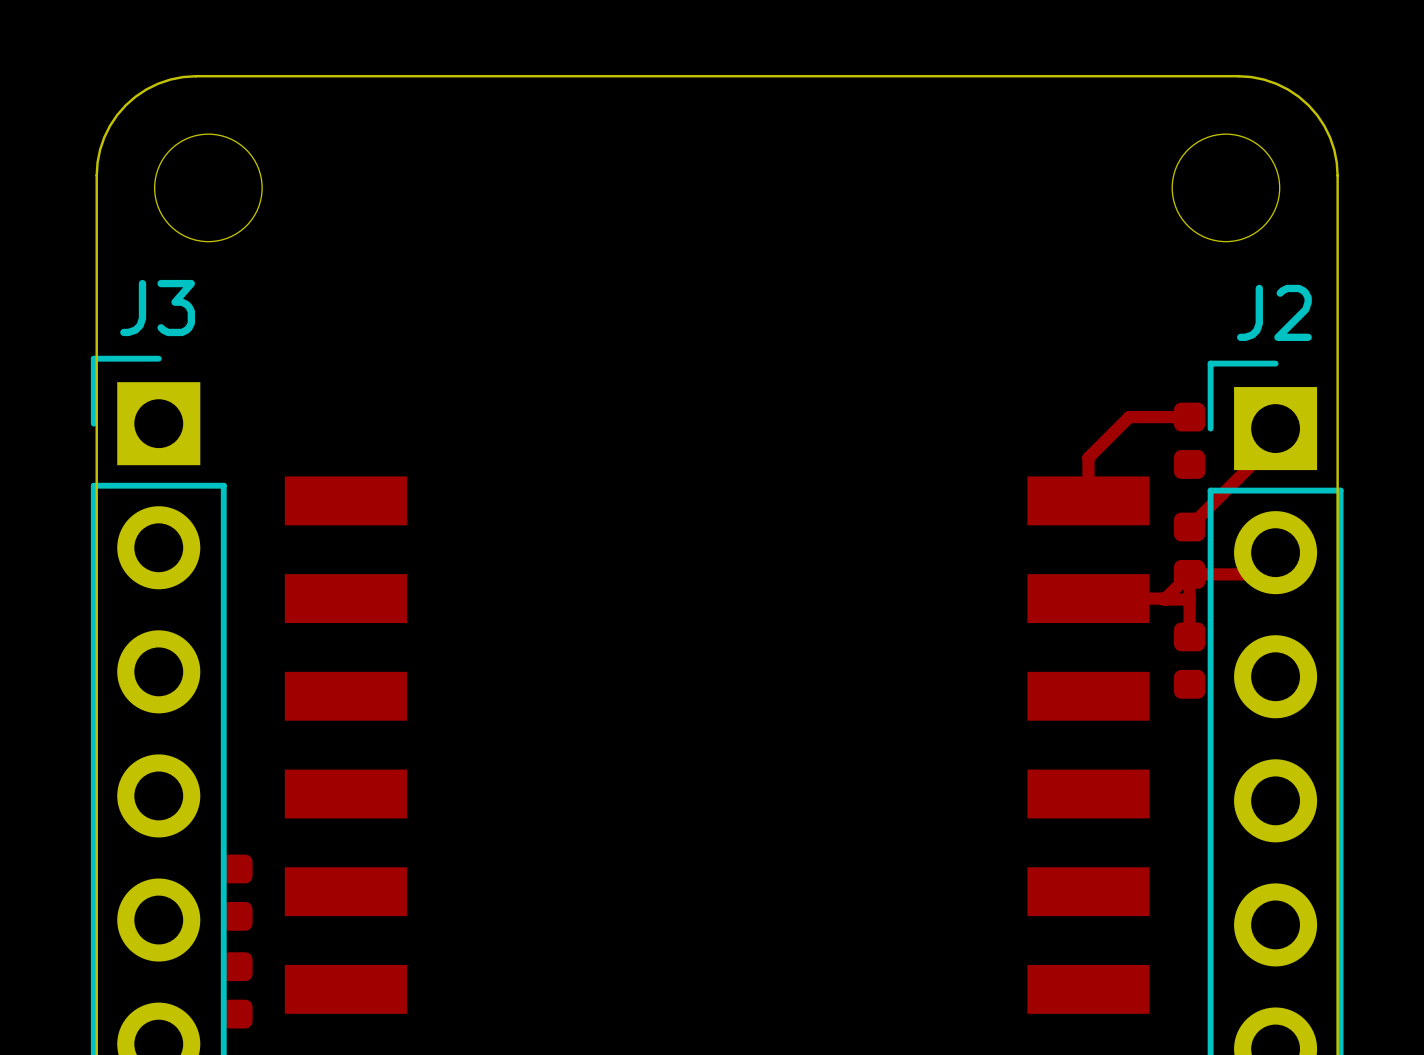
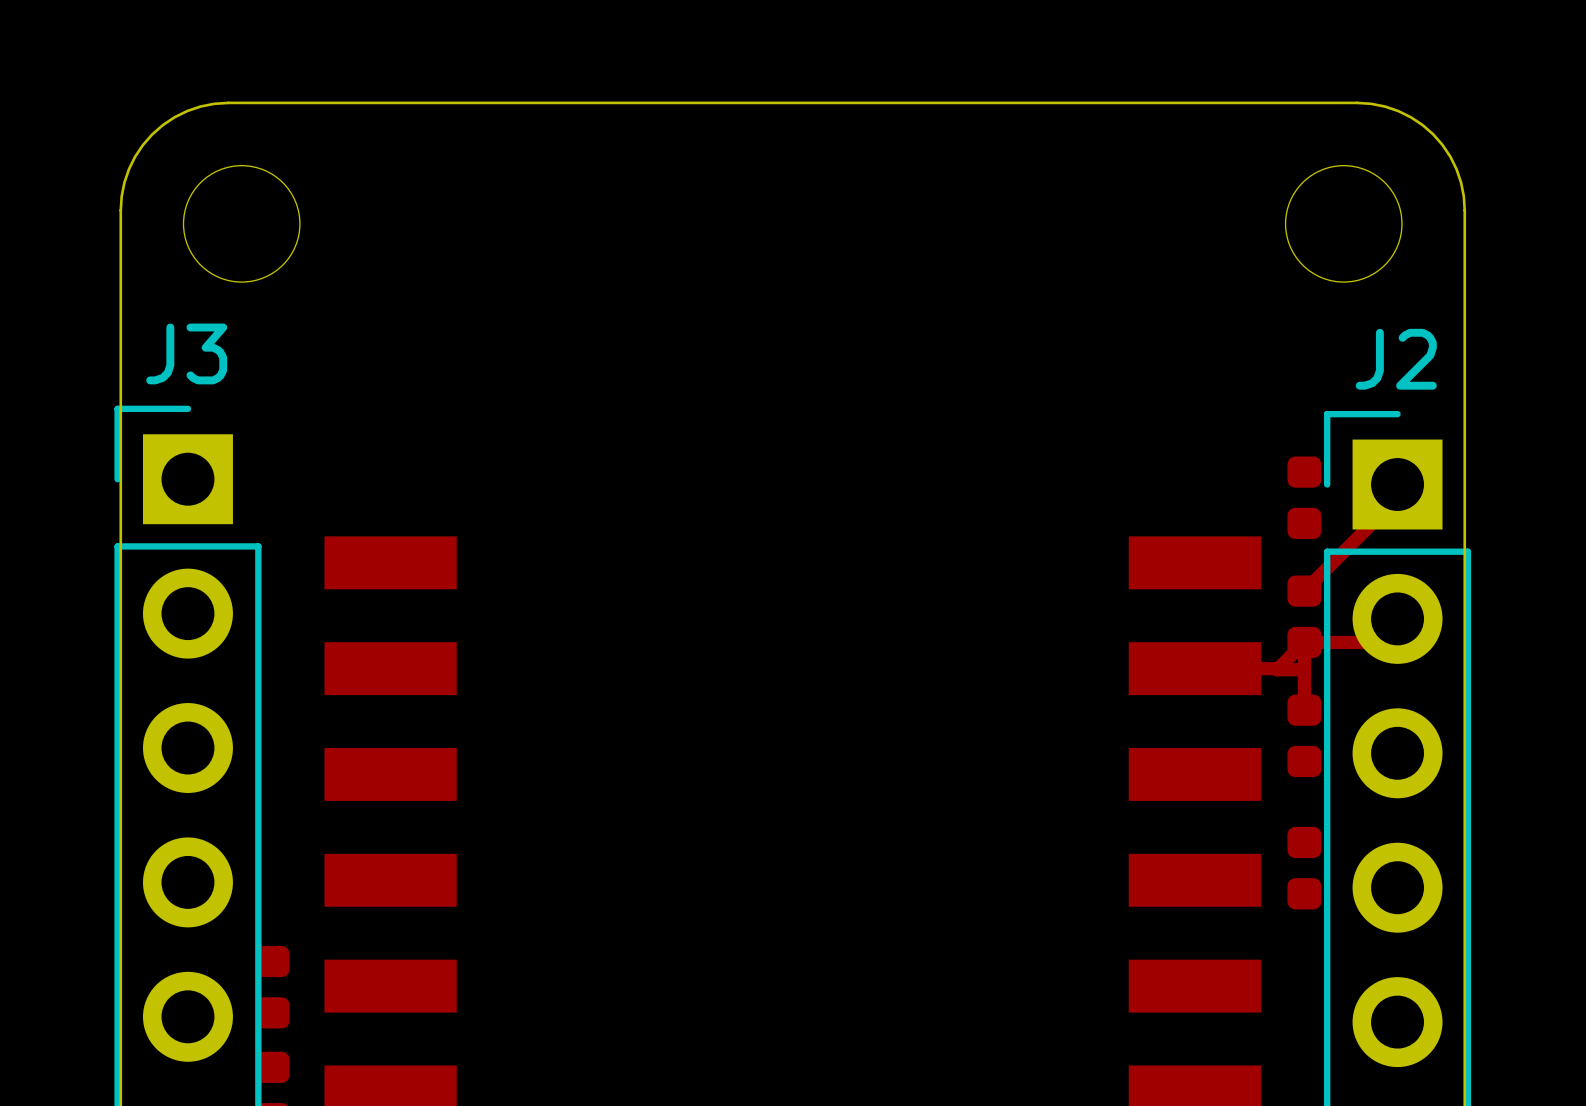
top track: (1189, 417) (1129, 417) (1088, 457) (1088, 500) -> none
part: none -> (1304, 868)

